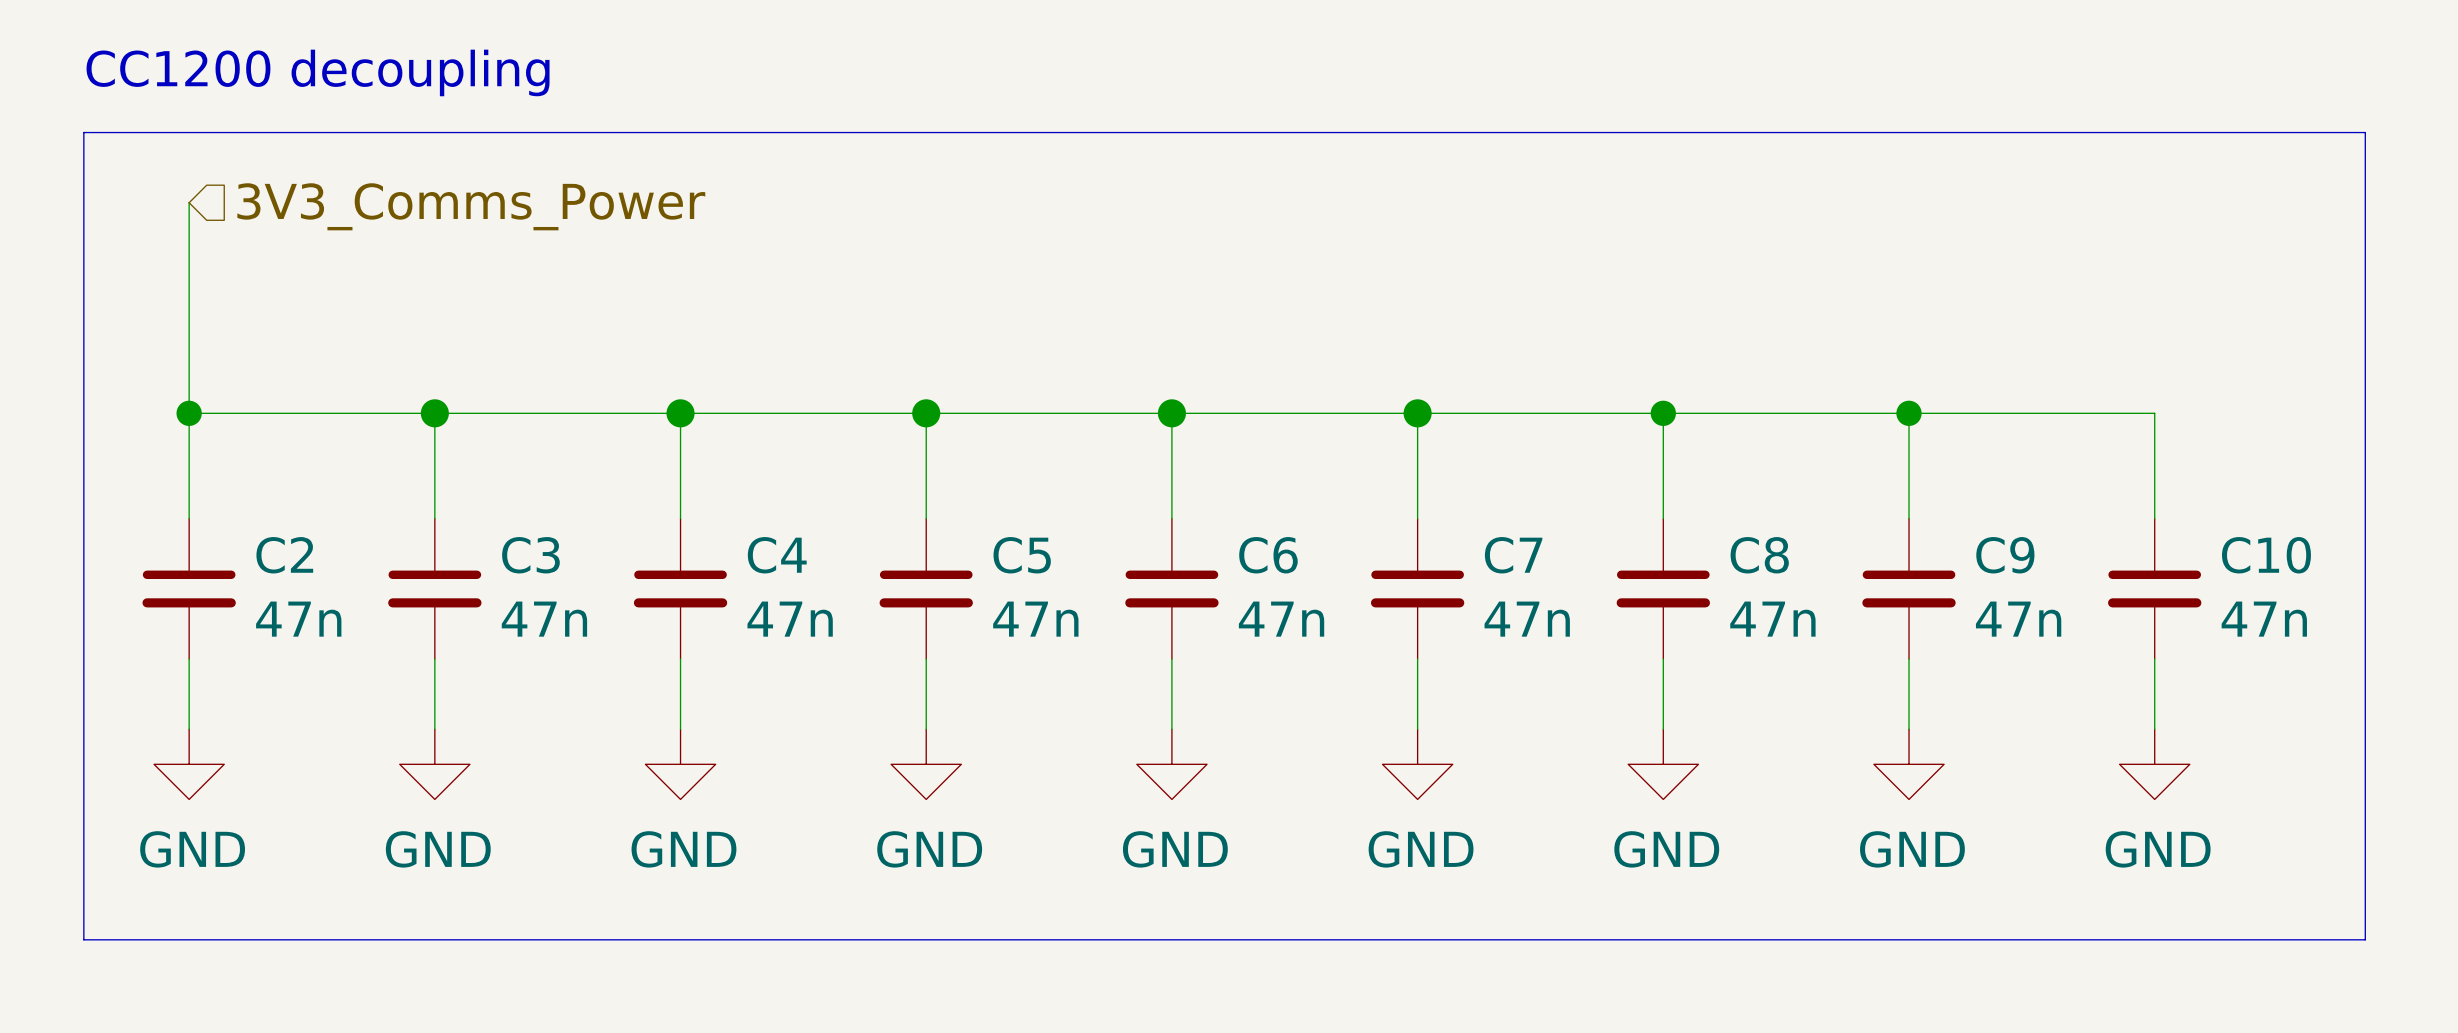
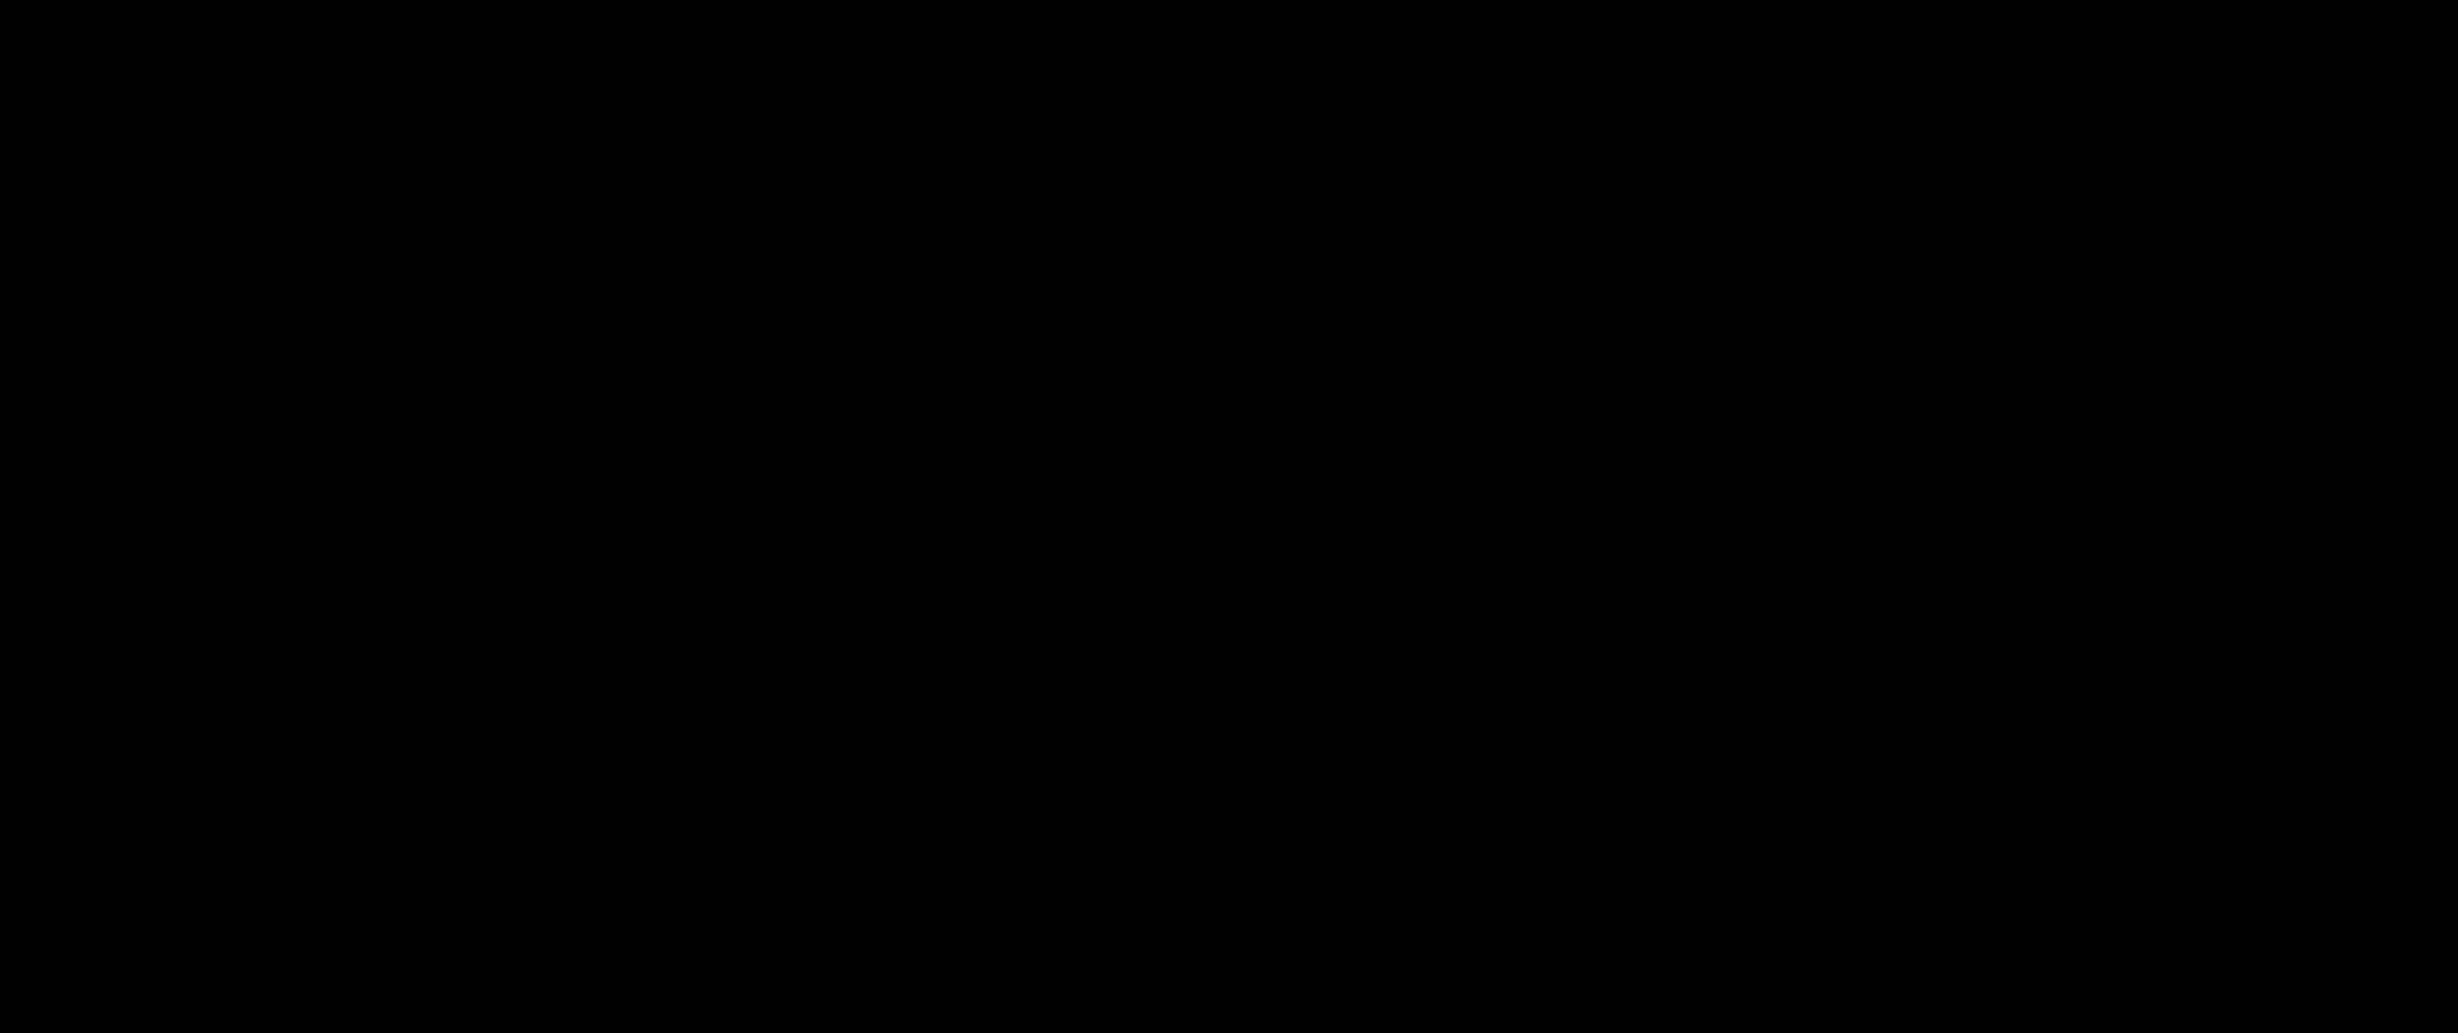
text: CC1200 decoupling (318, 72) -> none
line: (83, 132) (2365, 132) (2365, 939) (83, 939) (83, 132) -> none
wire: (189, 202) (189, 518) -> none
hierarchical label: 3V3_Comms_Power (471, 206) -> none
wire: (189, 413) (2154, 413) (2154, 518) -> none
junction: (189, 413) -> none
wire: (434, 413) (434, 518) -> none
junction: (434, 413) -> none
wire: (680, 413) (680, 518) -> none
junction: (680, 413) -> none
wire: (926, 413) (926, 518) -> none
junction: (926, 413) -> none
wire: (1171, 413) (1171, 518) -> none
junction: (1171, 413) -> none
wire: (1417, 413) (1417, 518) -> none
junction: (1417, 413) -> none
wire: (1663, 413) (1663, 518) -> none
junction: (1663, 413) -> none
wire: (1909, 413) (1909, 518) -> none
junction: (1909, 413) -> none
C2: 47n (189, 588) -> none
C3: 47n (434, 588) -> none
C4: 47n (680, 588) -> none
C5: 47n (926, 588) -> none
C6: 47n (1171, 588) -> none
C7: 47n (1417, 588) -> none
C8: 47n (1663, 588) -> none
C9: 47n (1909, 588) -> none
C10: 47n (2154, 588) -> none
wire: (189, 659) (189, 729) -> none
wire: (434, 659) (434, 729) -> none
wire: (680, 659) (680, 729) -> none
wire: (926, 659) (926, 729) -> none
wire: (1171, 659) (1171, 729) -> none
wire: (1417, 659) (1417, 729) -> none
wire: (1663, 659) (1663, 729) -> none
wire: (1909, 659) (1909, 729) -> none
wire: (2154, 659) (2154, 729) -> none
power symbol: GND (189, 764) -> none
power symbol: GND (434, 764) -> none
power symbol: GND (680, 764) -> none
power symbol: GND (926, 764) -> none
power symbol: GND (1171, 764) -> none
power symbol: GND (1417, 764) -> none
power symbol: GND (1663, 764) -> none
power symbol: GND (1909, 764) -> none
power symbol: GND (2154, 764) -> none

